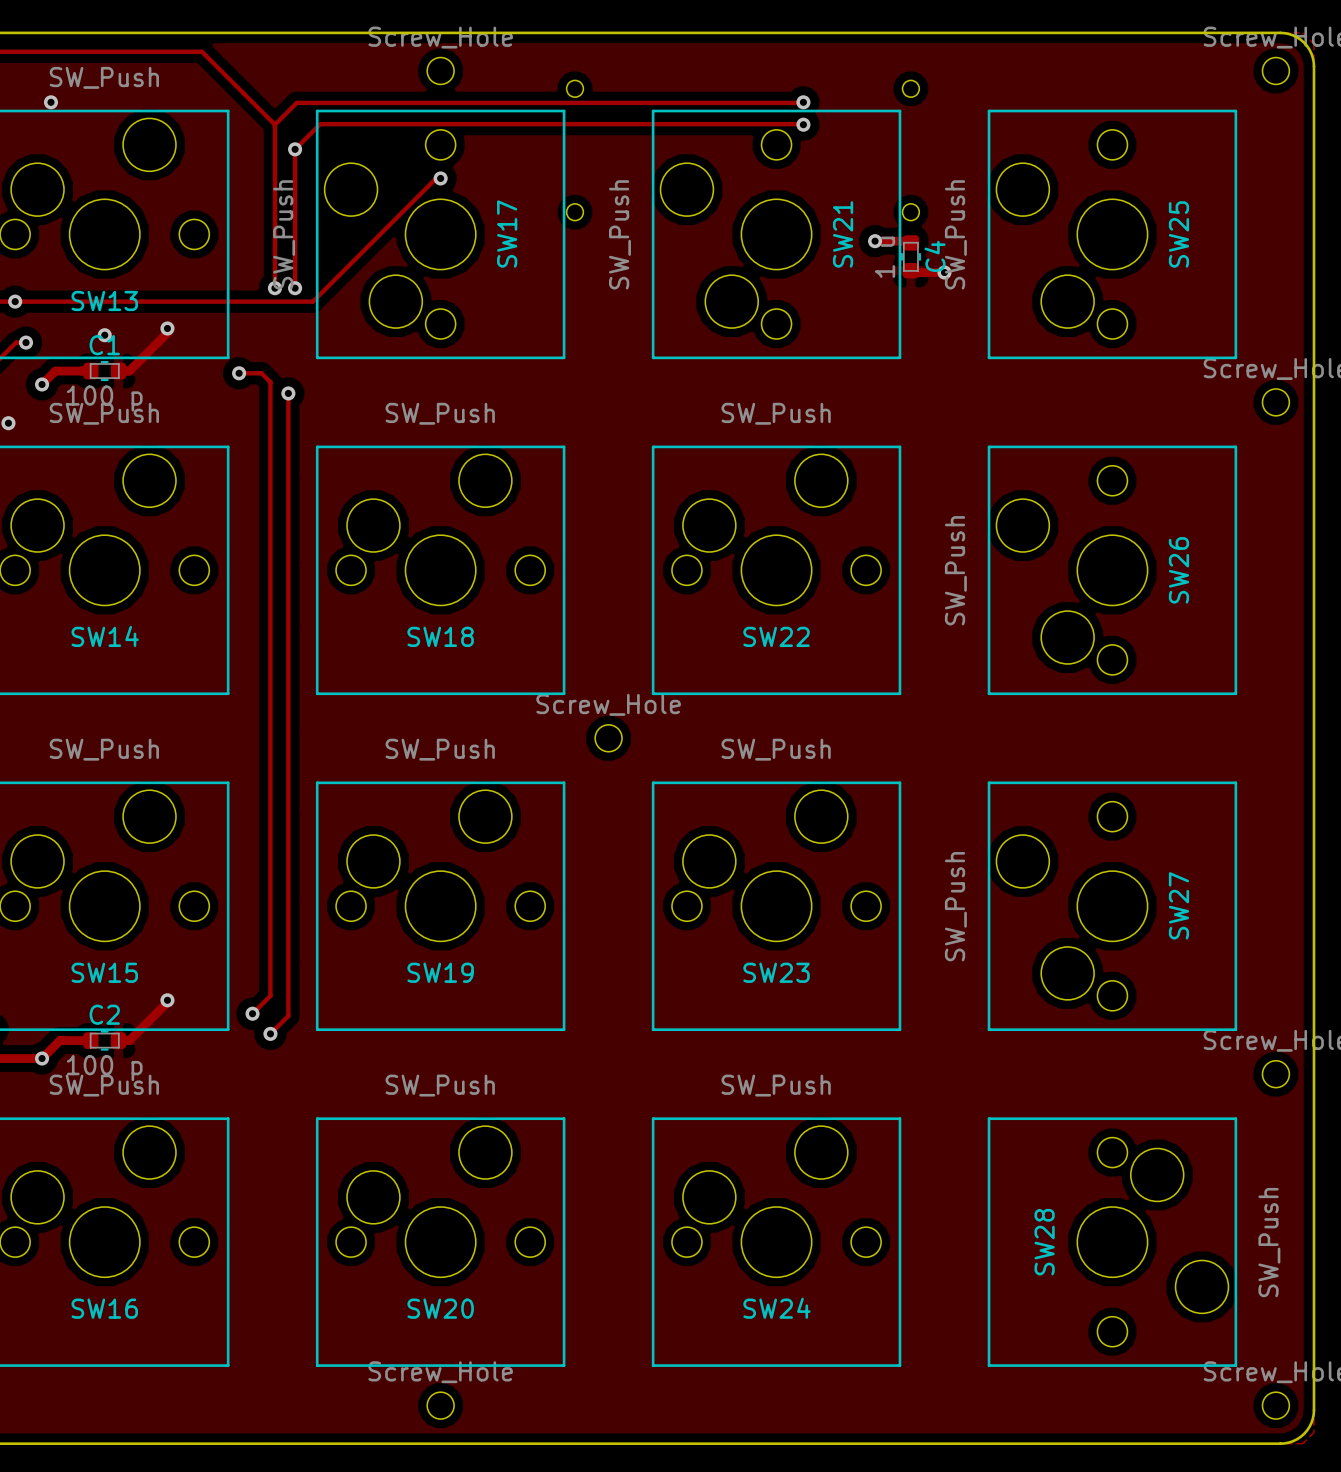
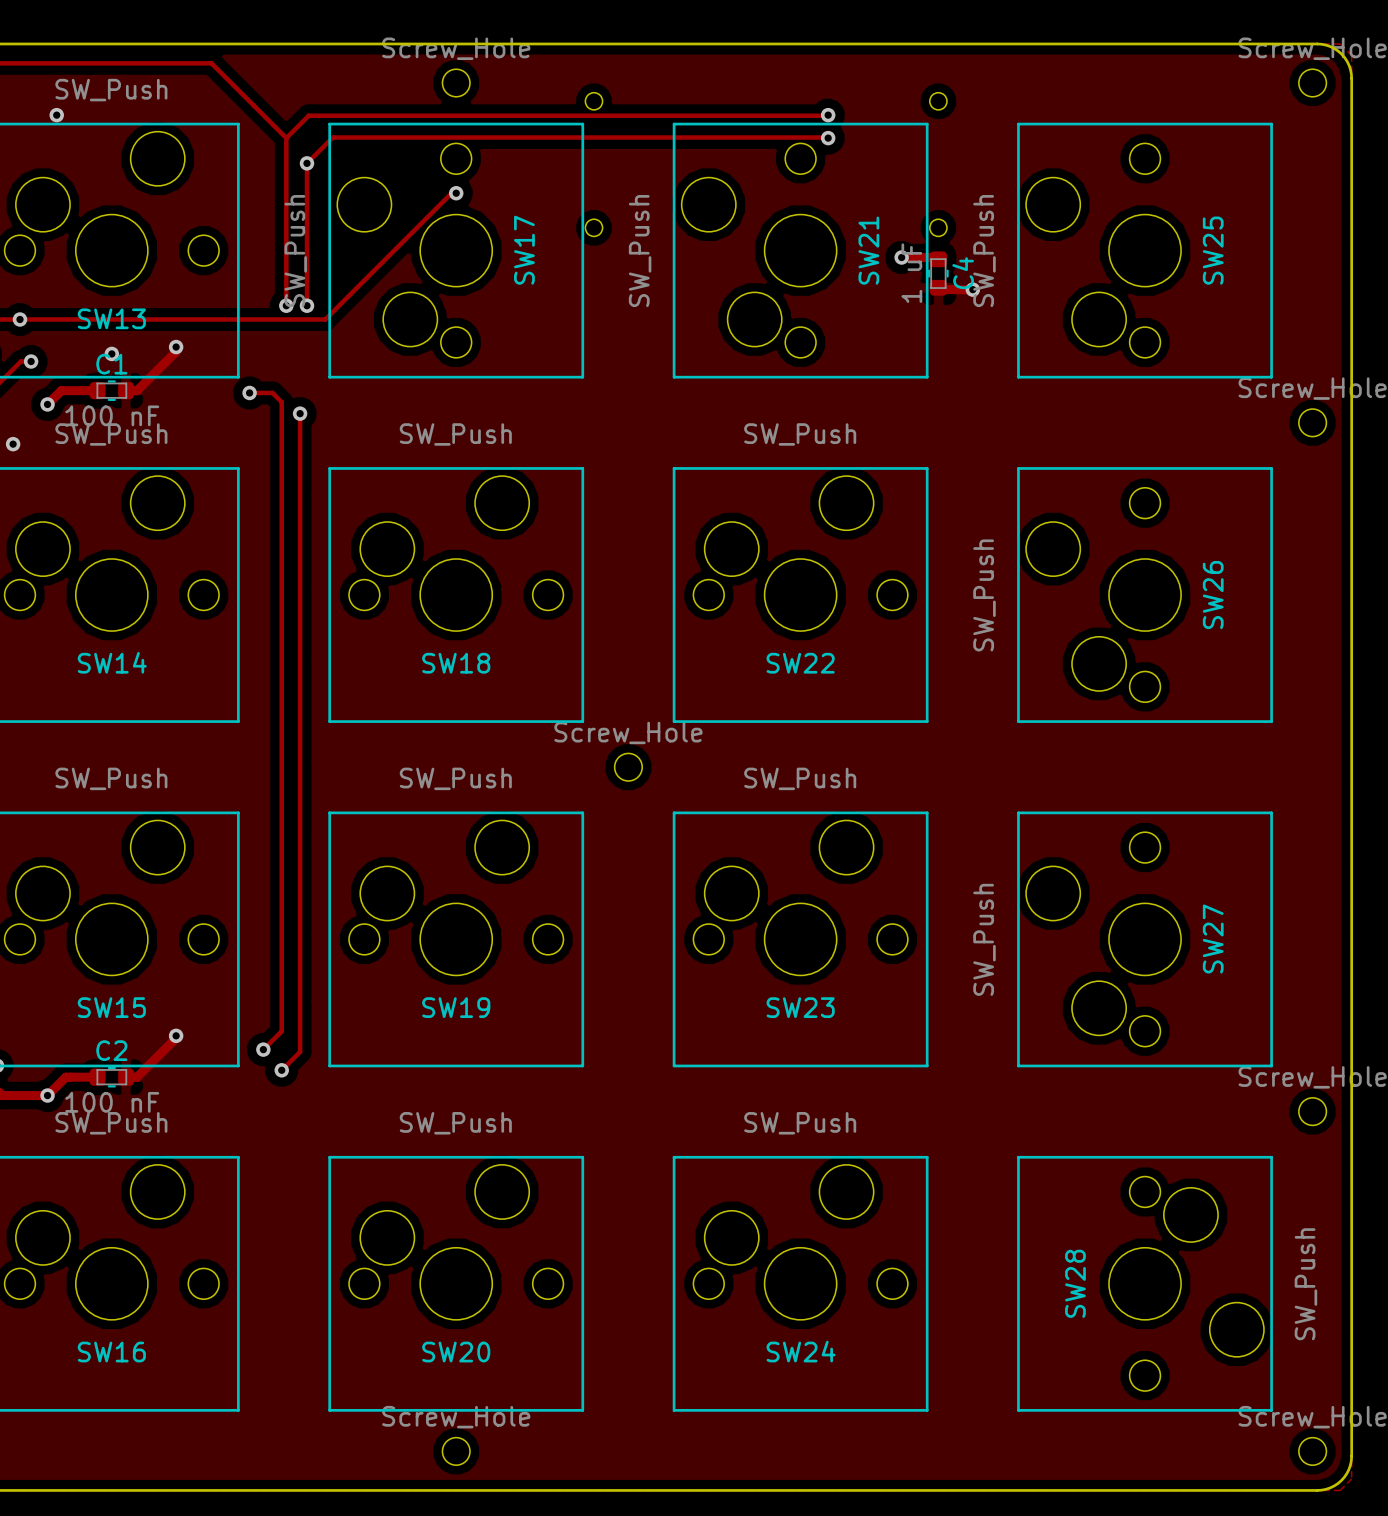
C4 value: 1 u (885, 257) -> 1 uF (911, 273)
C1 value: 100 p (104, 398) -> 100 nF (112, 415)
C2 value: 100 p (104, 1068) -> 100 nF (112, 1102)

